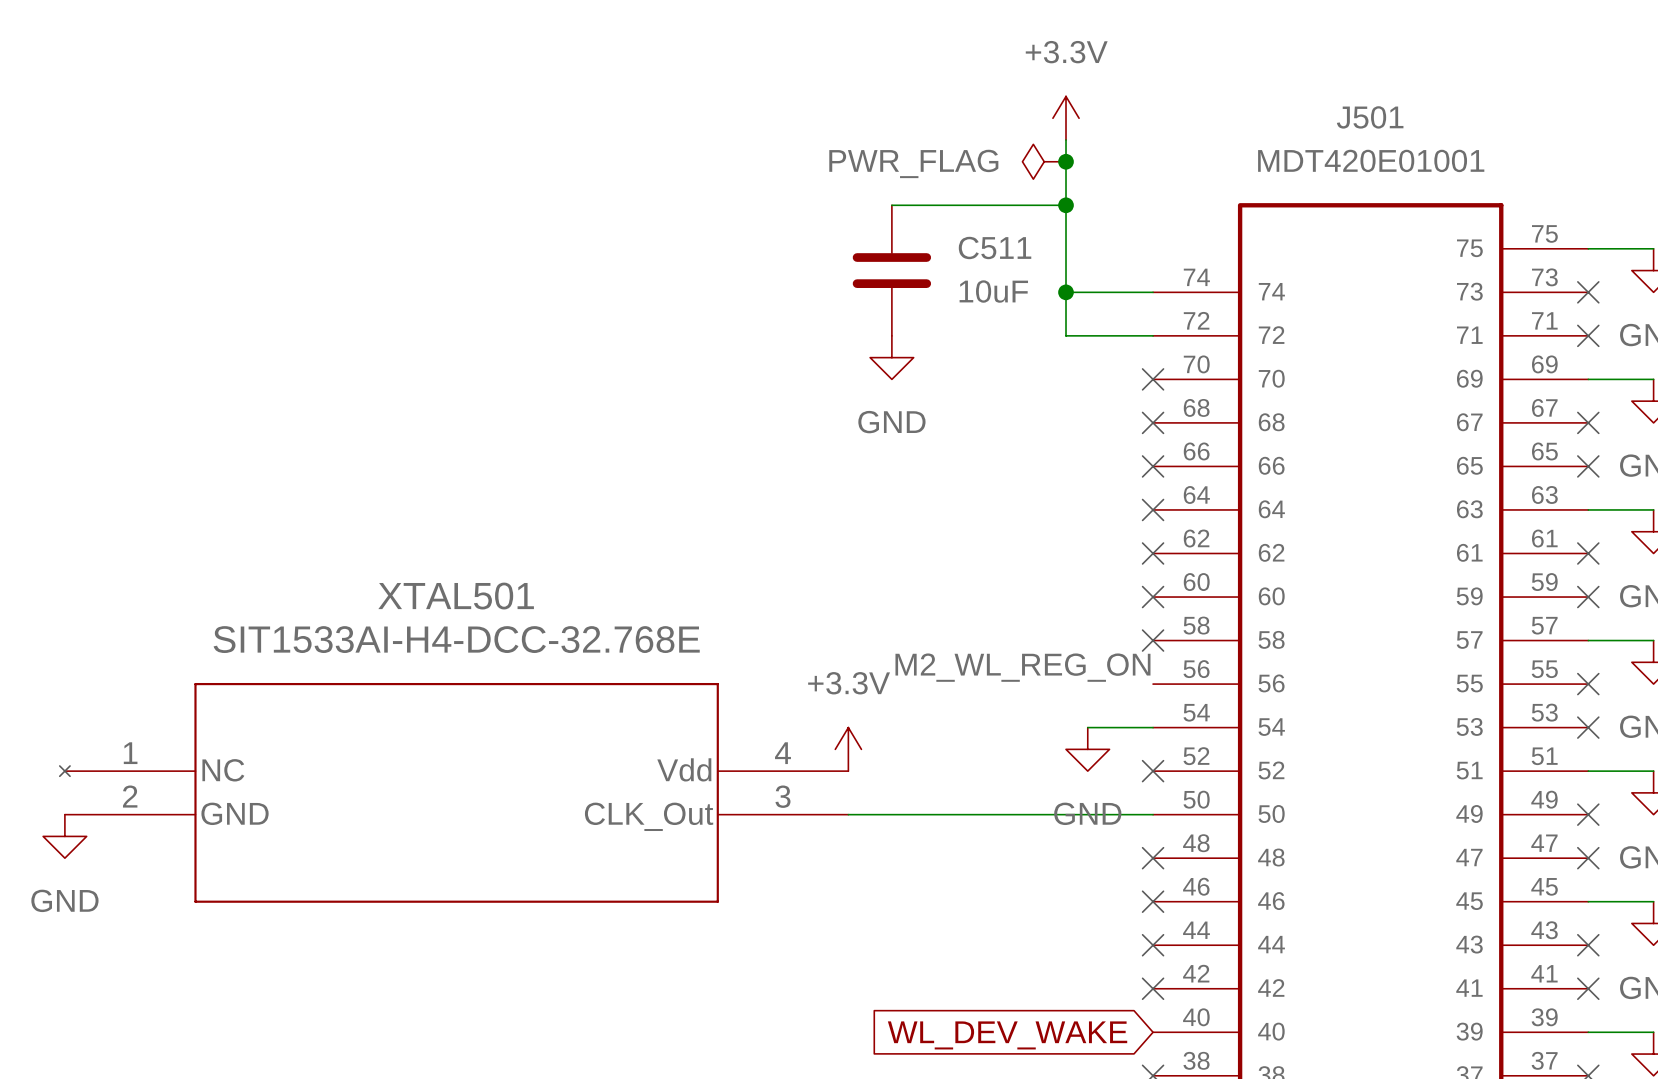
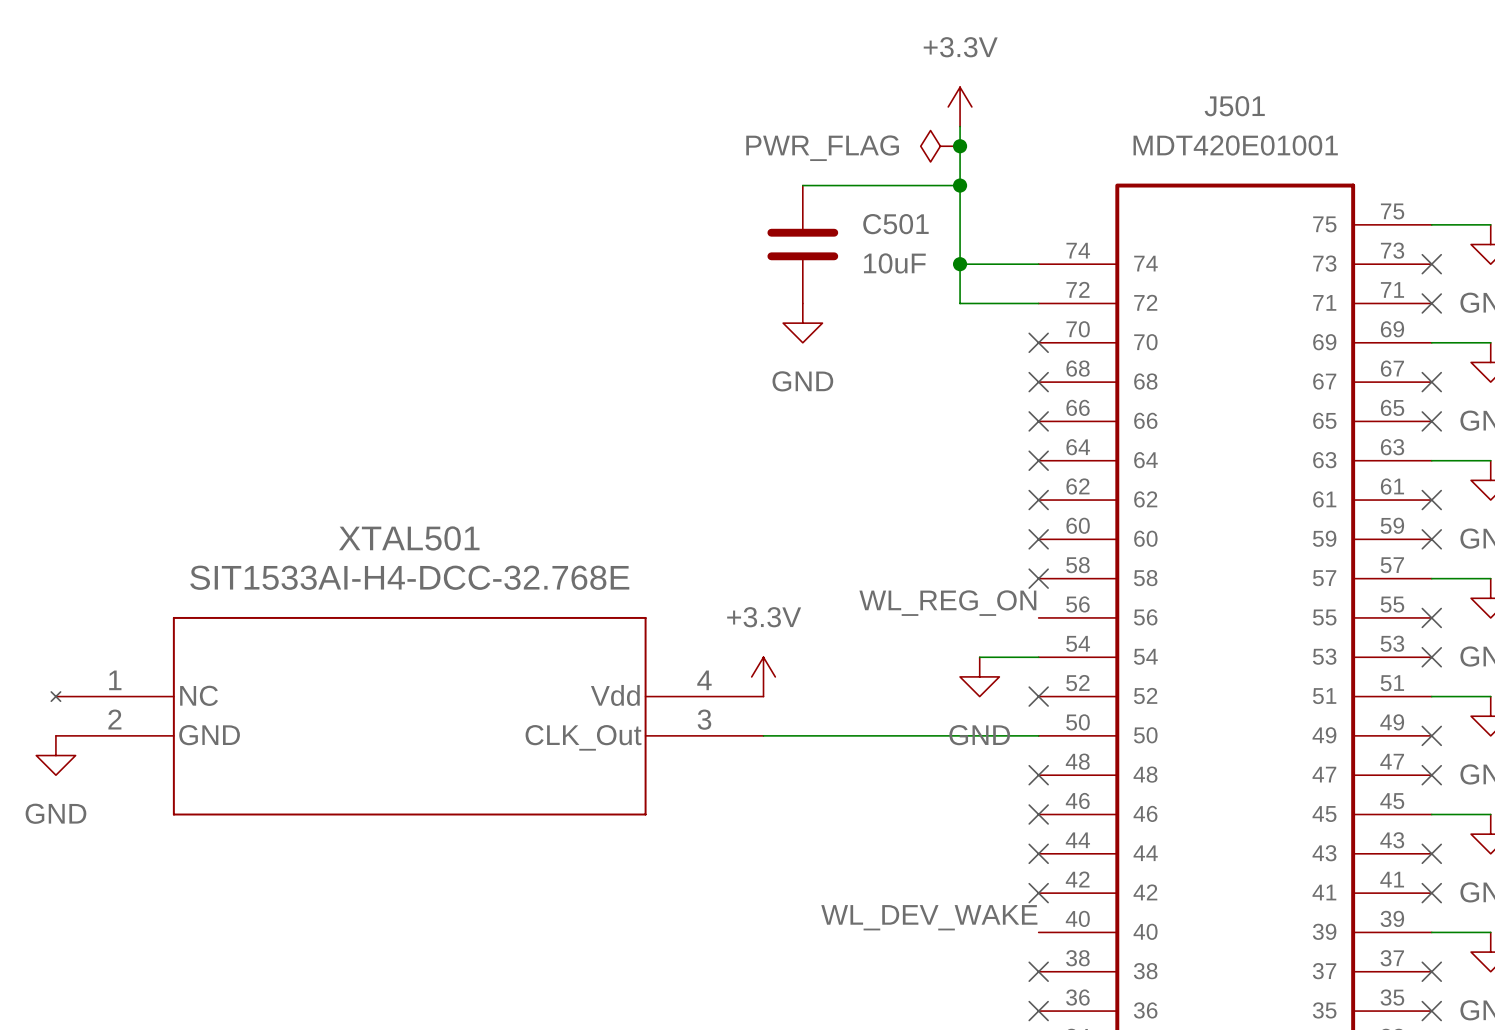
C511 name: C511 (995, 247) -> C501 (895, 224)
label: M2_WL_REG_ON (1022, 667) -> WL_REG_ON (947, 603)
label: none -> WL_DEV_WAKE (929, 917)
global label: WL_DEV_WAKE (1007, 1035) -> none

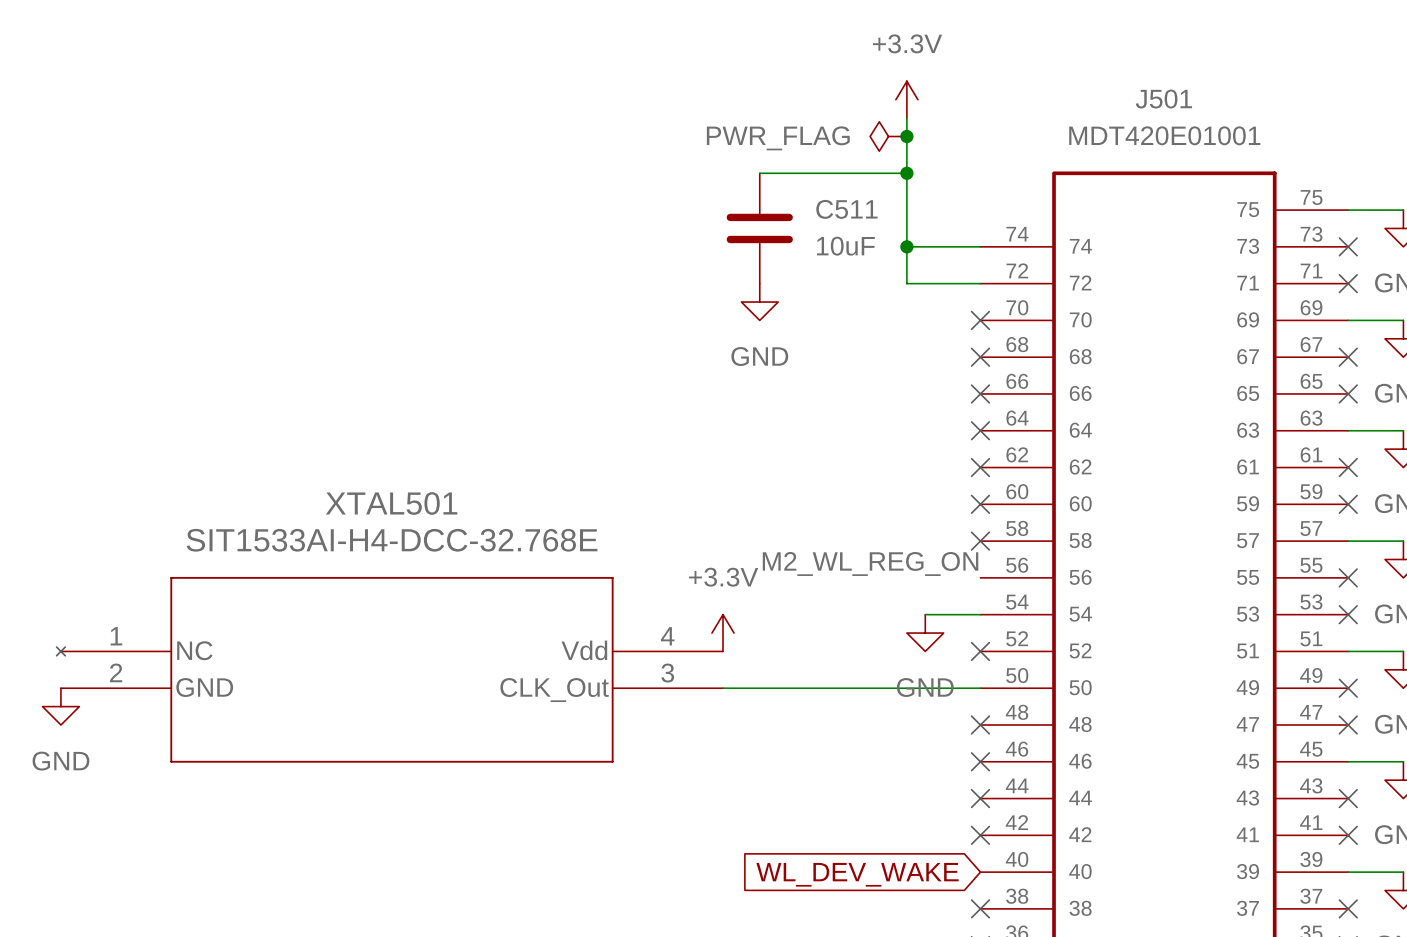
C501 name: C501 (895, 224) -> C511 (846, 209)
label: WL_REG_ON (947, 603) -> M2_WL_REG_ON (870, 563)
label: WL_DEV_WAKE (929, 917) -> none
global label: none -> WL_DEV_WAKE (857, 874)

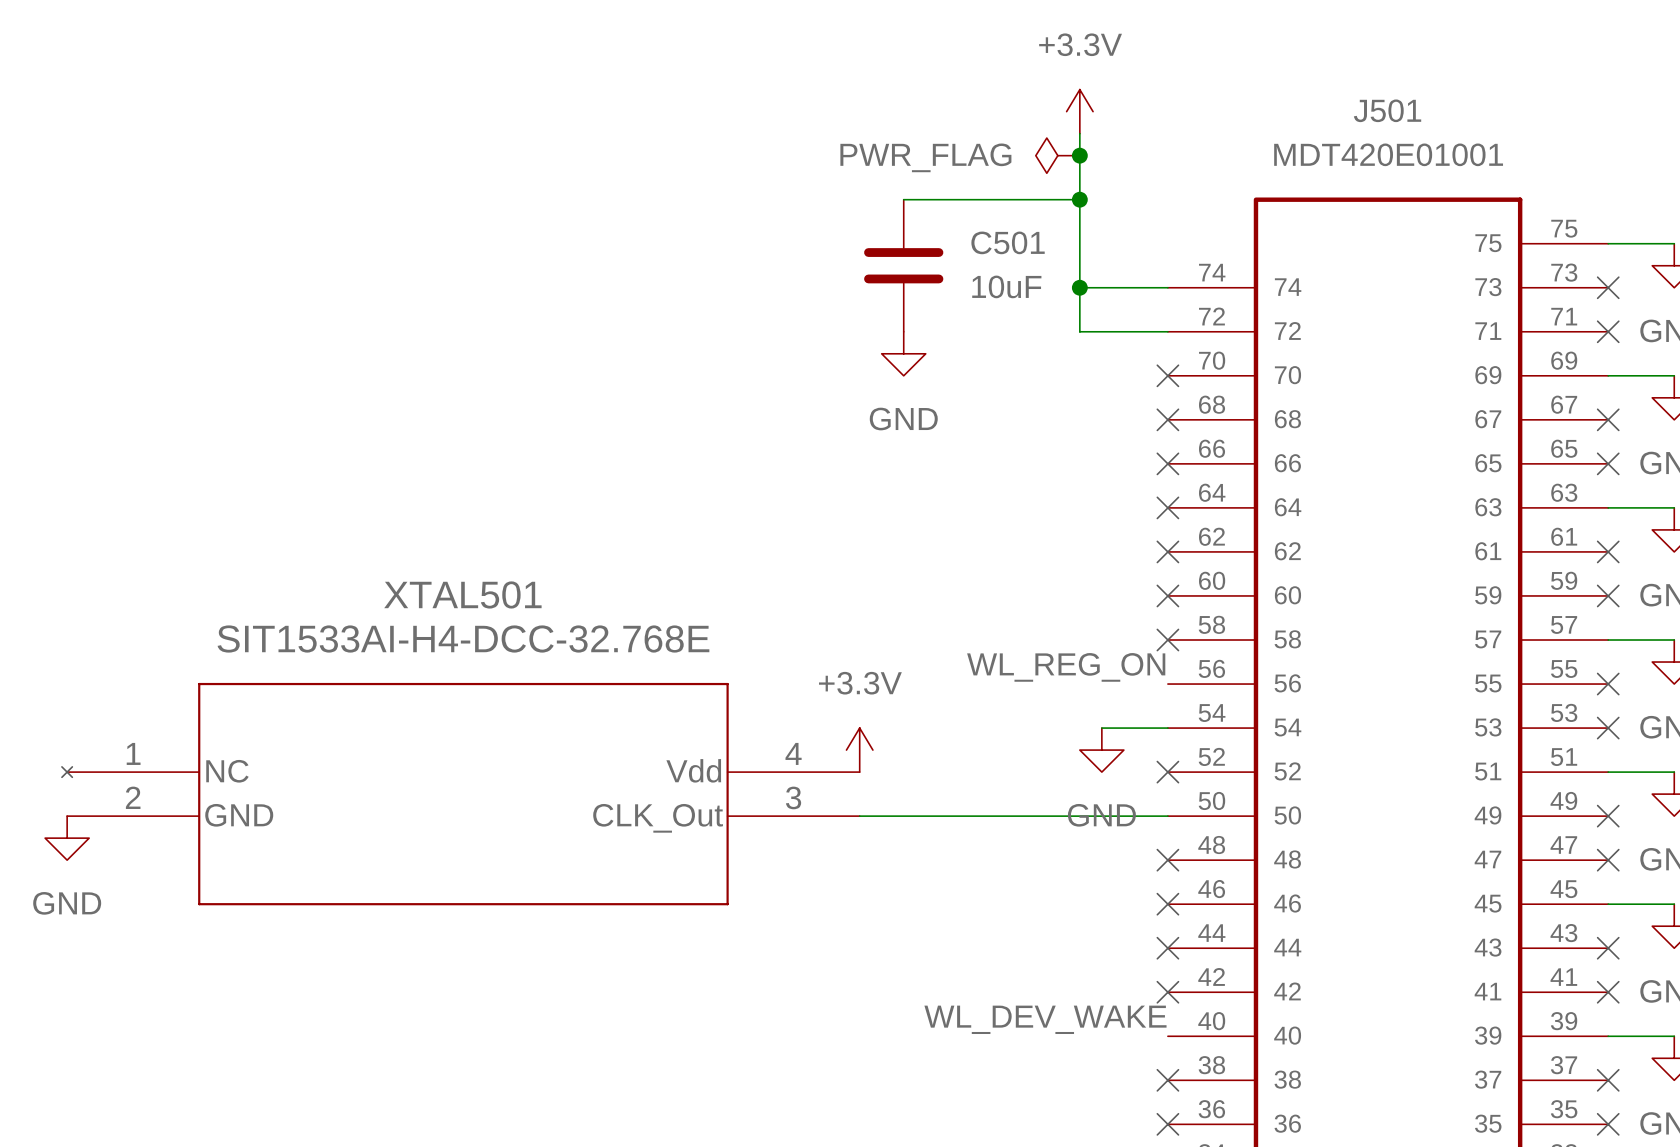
C511 name: C511 (846, 209) -> C501 (1008, 242)
label: M2_WL_REG_ON (870, 563) -> WL_REG_ON (1066, 667)
label: none -> WL_DEV_WAKE (1045, 1019)
global label: WL_DEV_WAKE (857, 874) -> none

